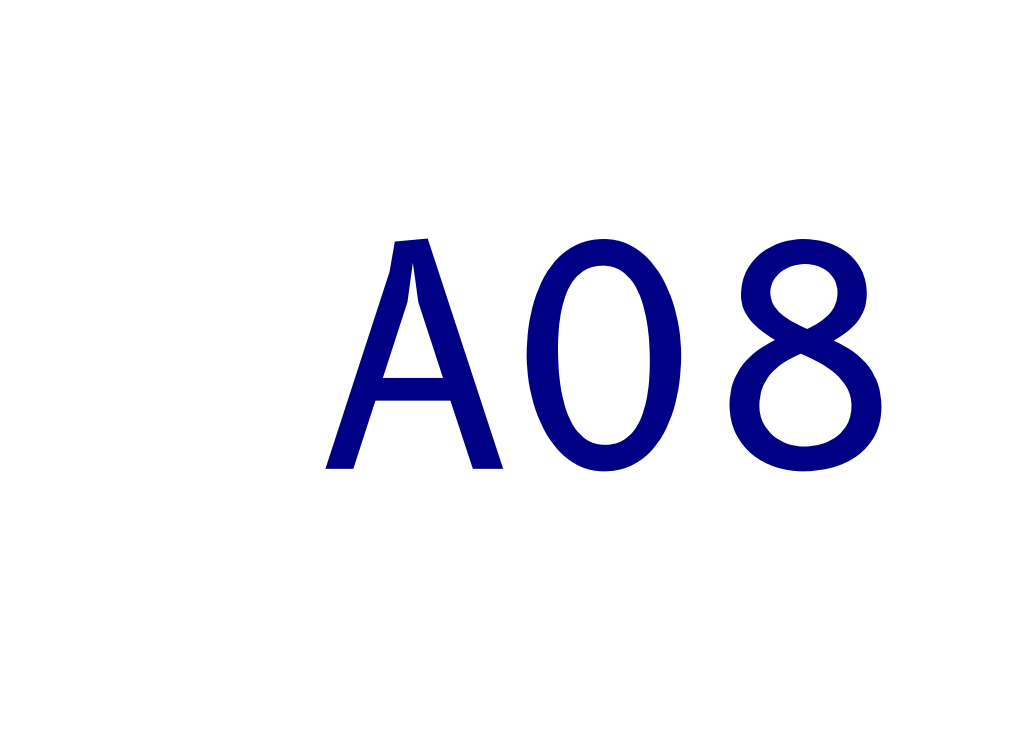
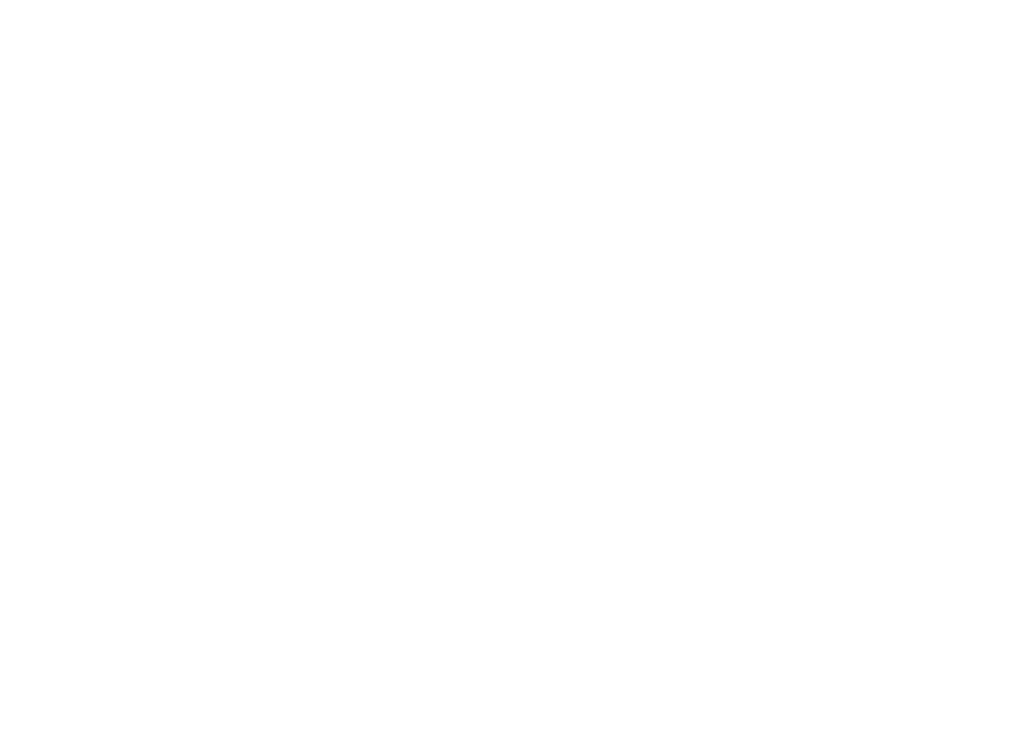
text: A08 (603, 354) -> none

